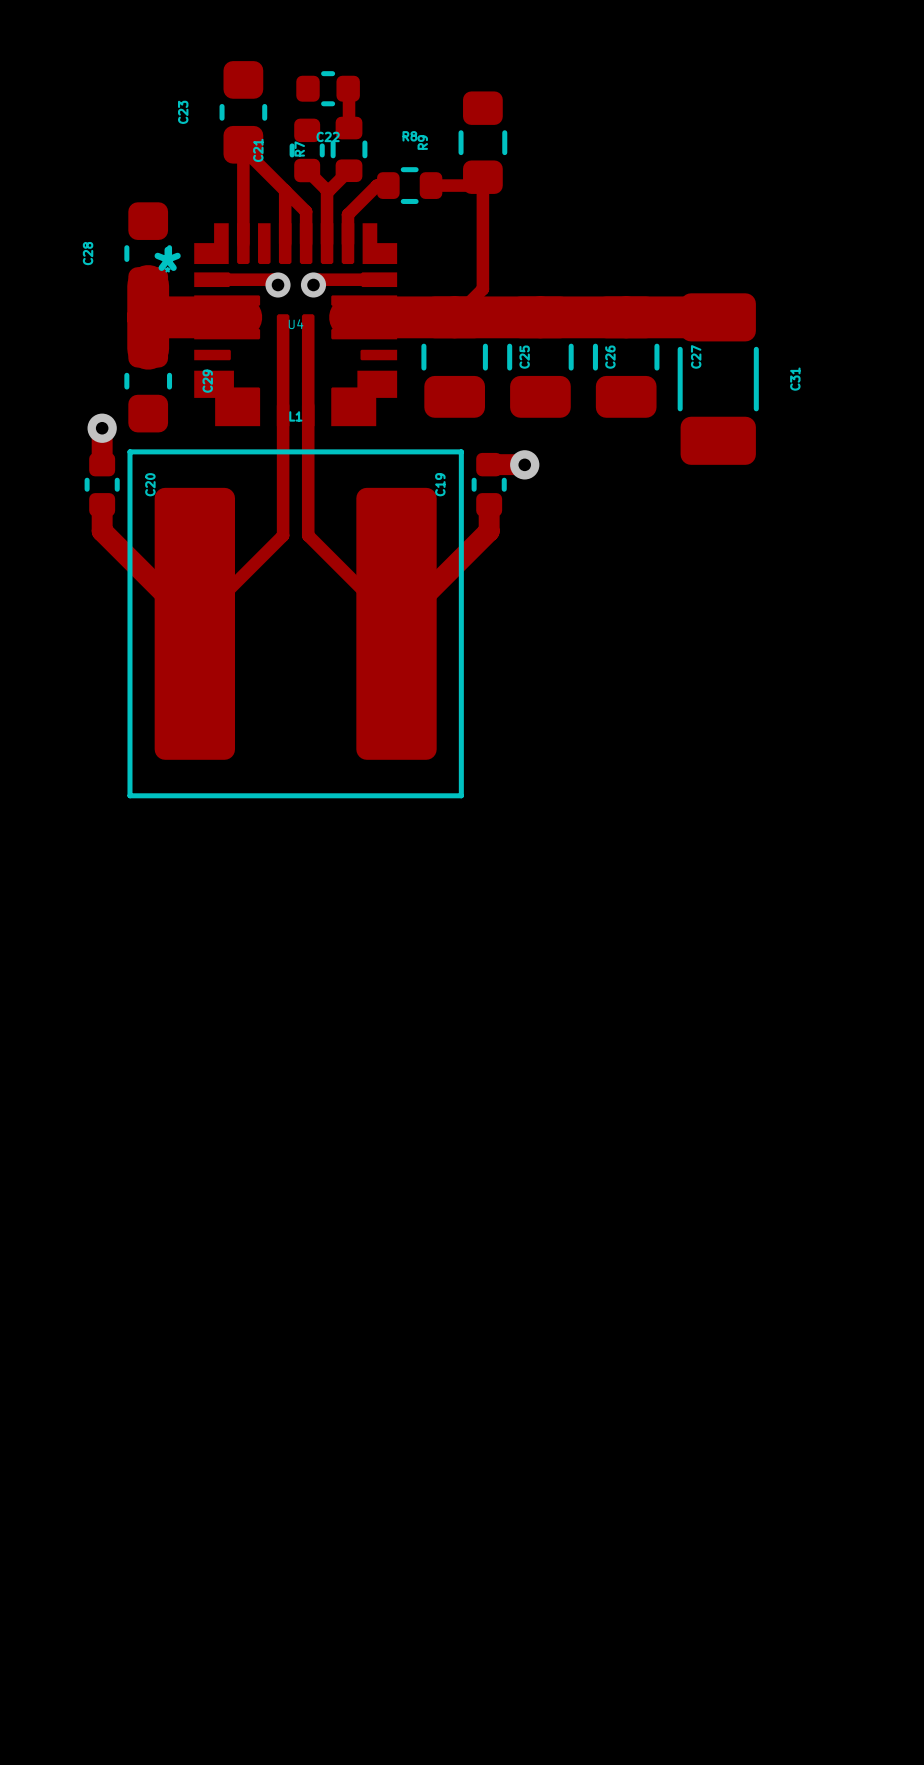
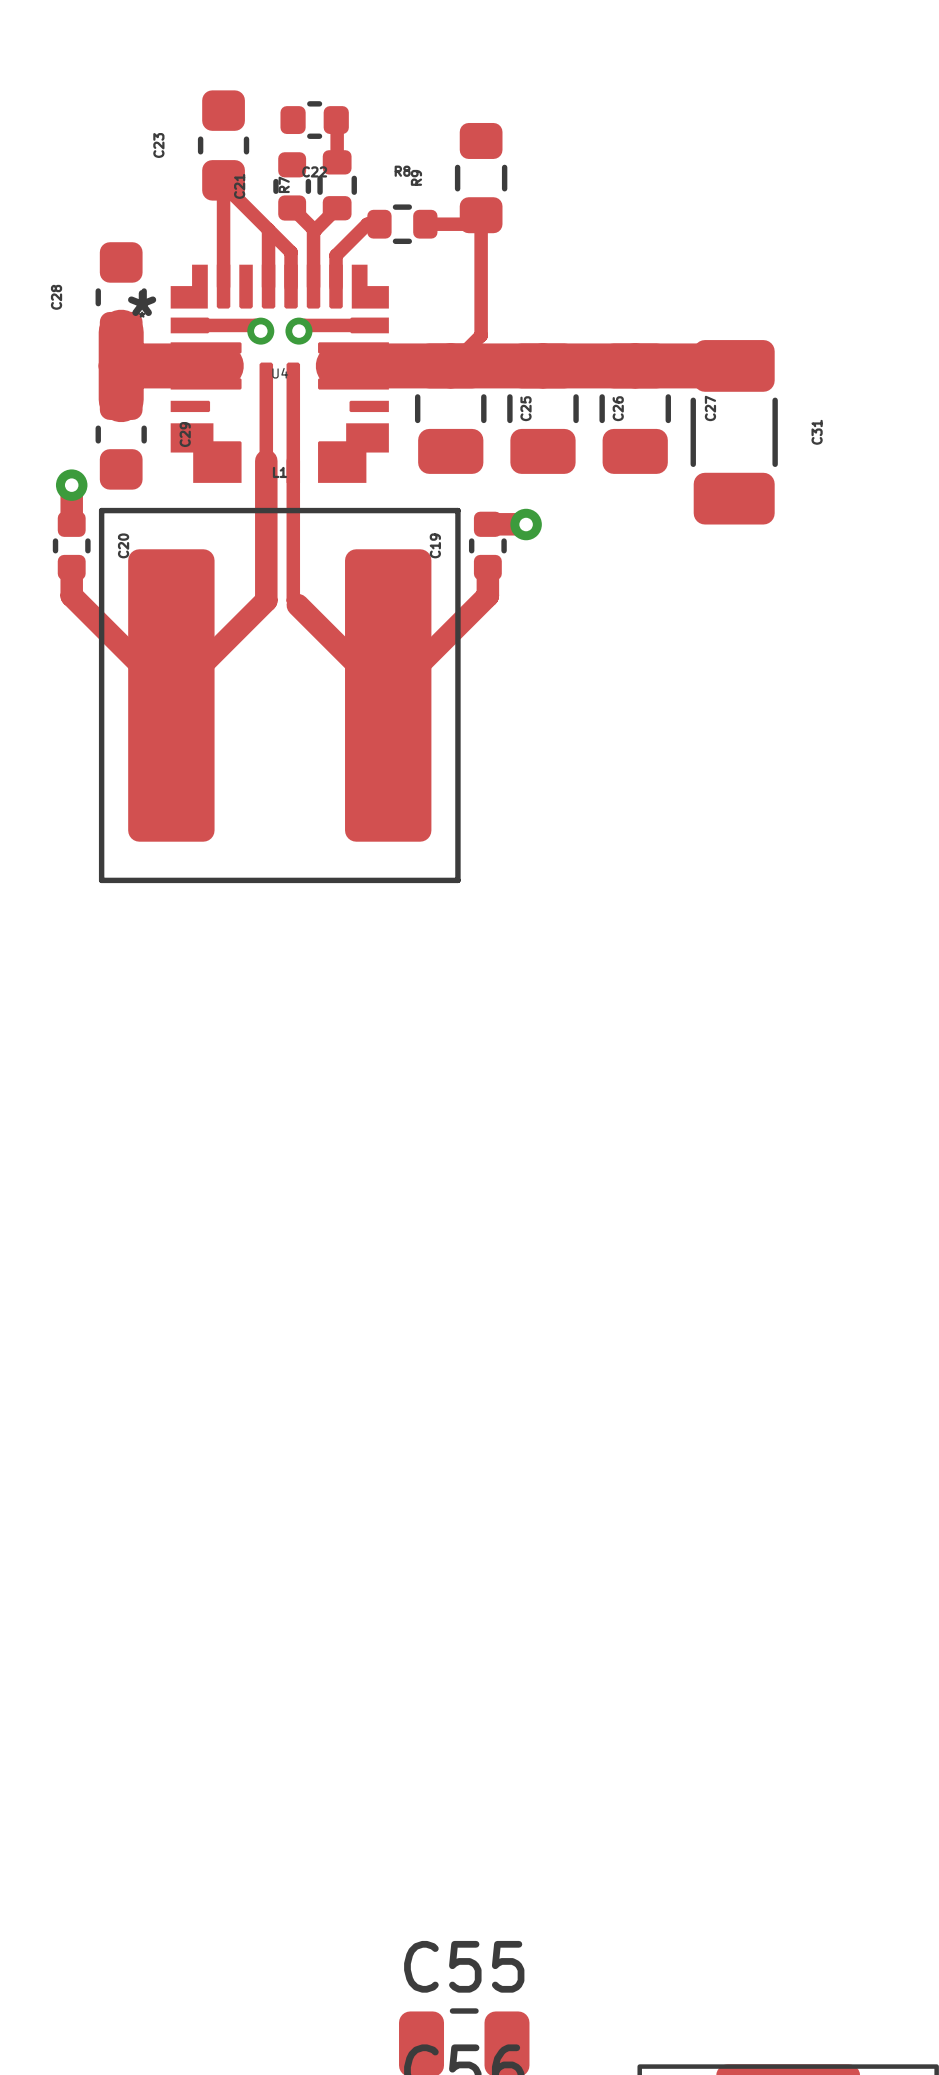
track width: thin (283, 405) (283, 535) (194, 623) -> thick (266, 460) (266, 600) (171, 695)
track width: thin (312, 539) (396, 623) -> thick (297, 605) (388, 695)

